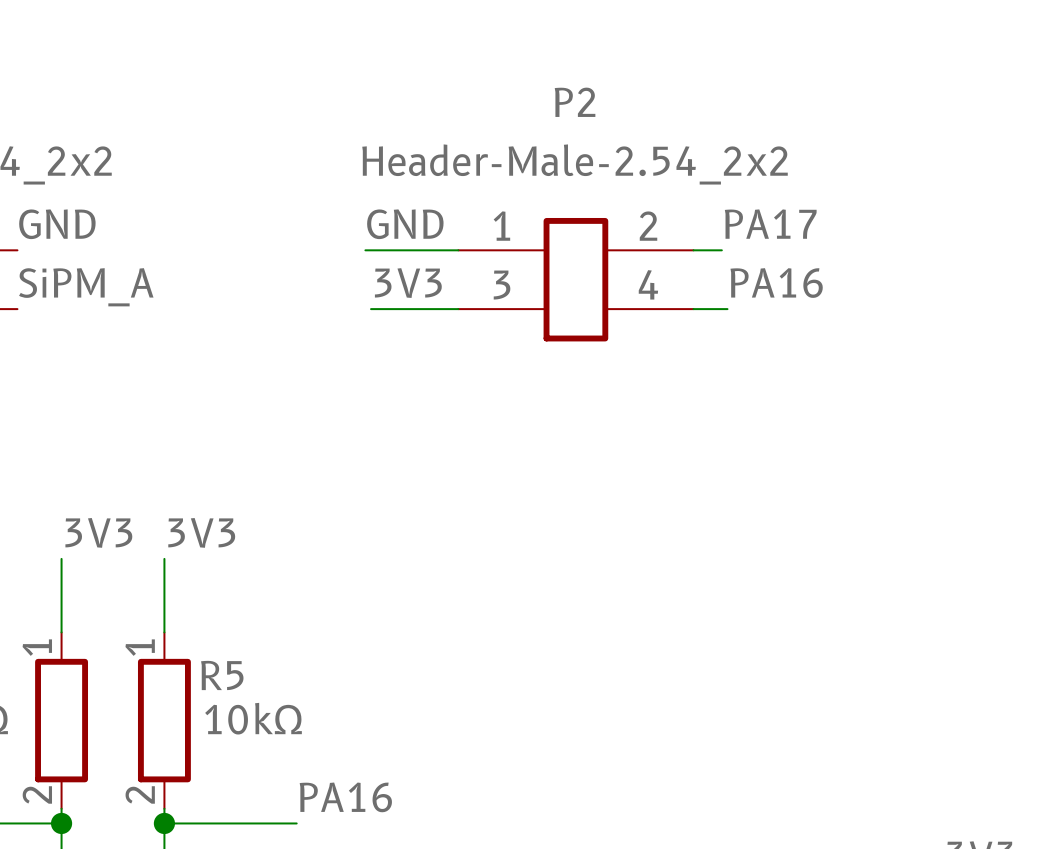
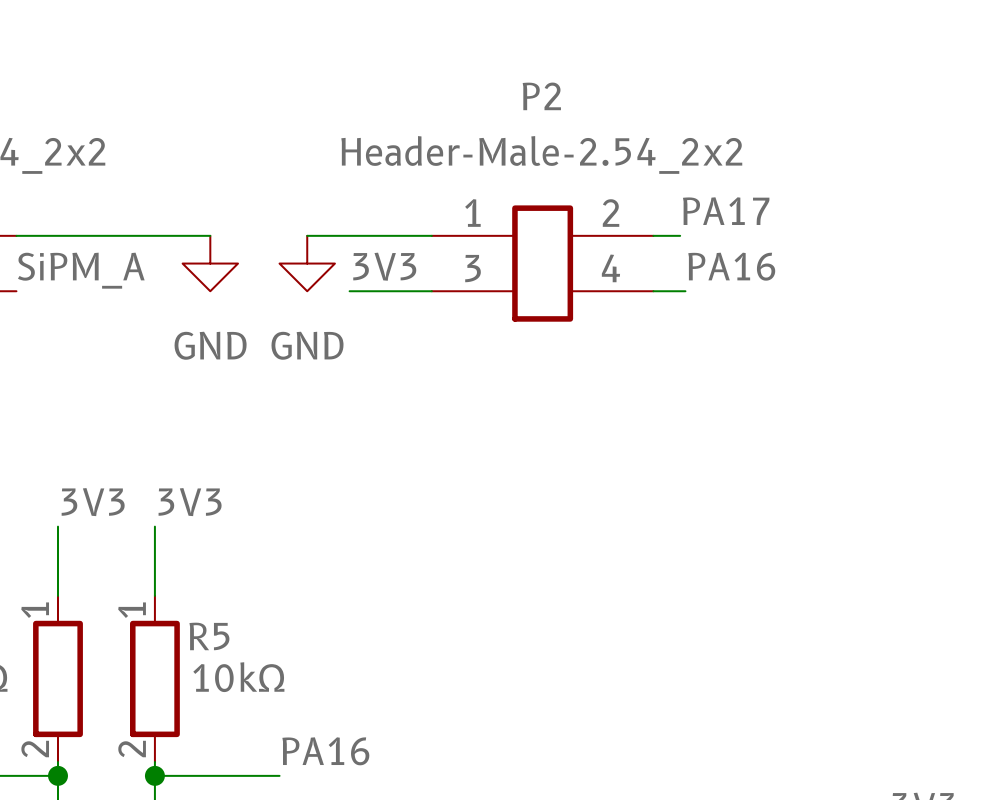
label: GND (57, 224) -> none
label: GND (405, 224) -> none
wire: none -> (16, 235) (210, 235)
wire: none -> (307, 235) (344, 235)
power symbol: none -> GND (210, 263)
power symbol: none -> GND (307, 263)

